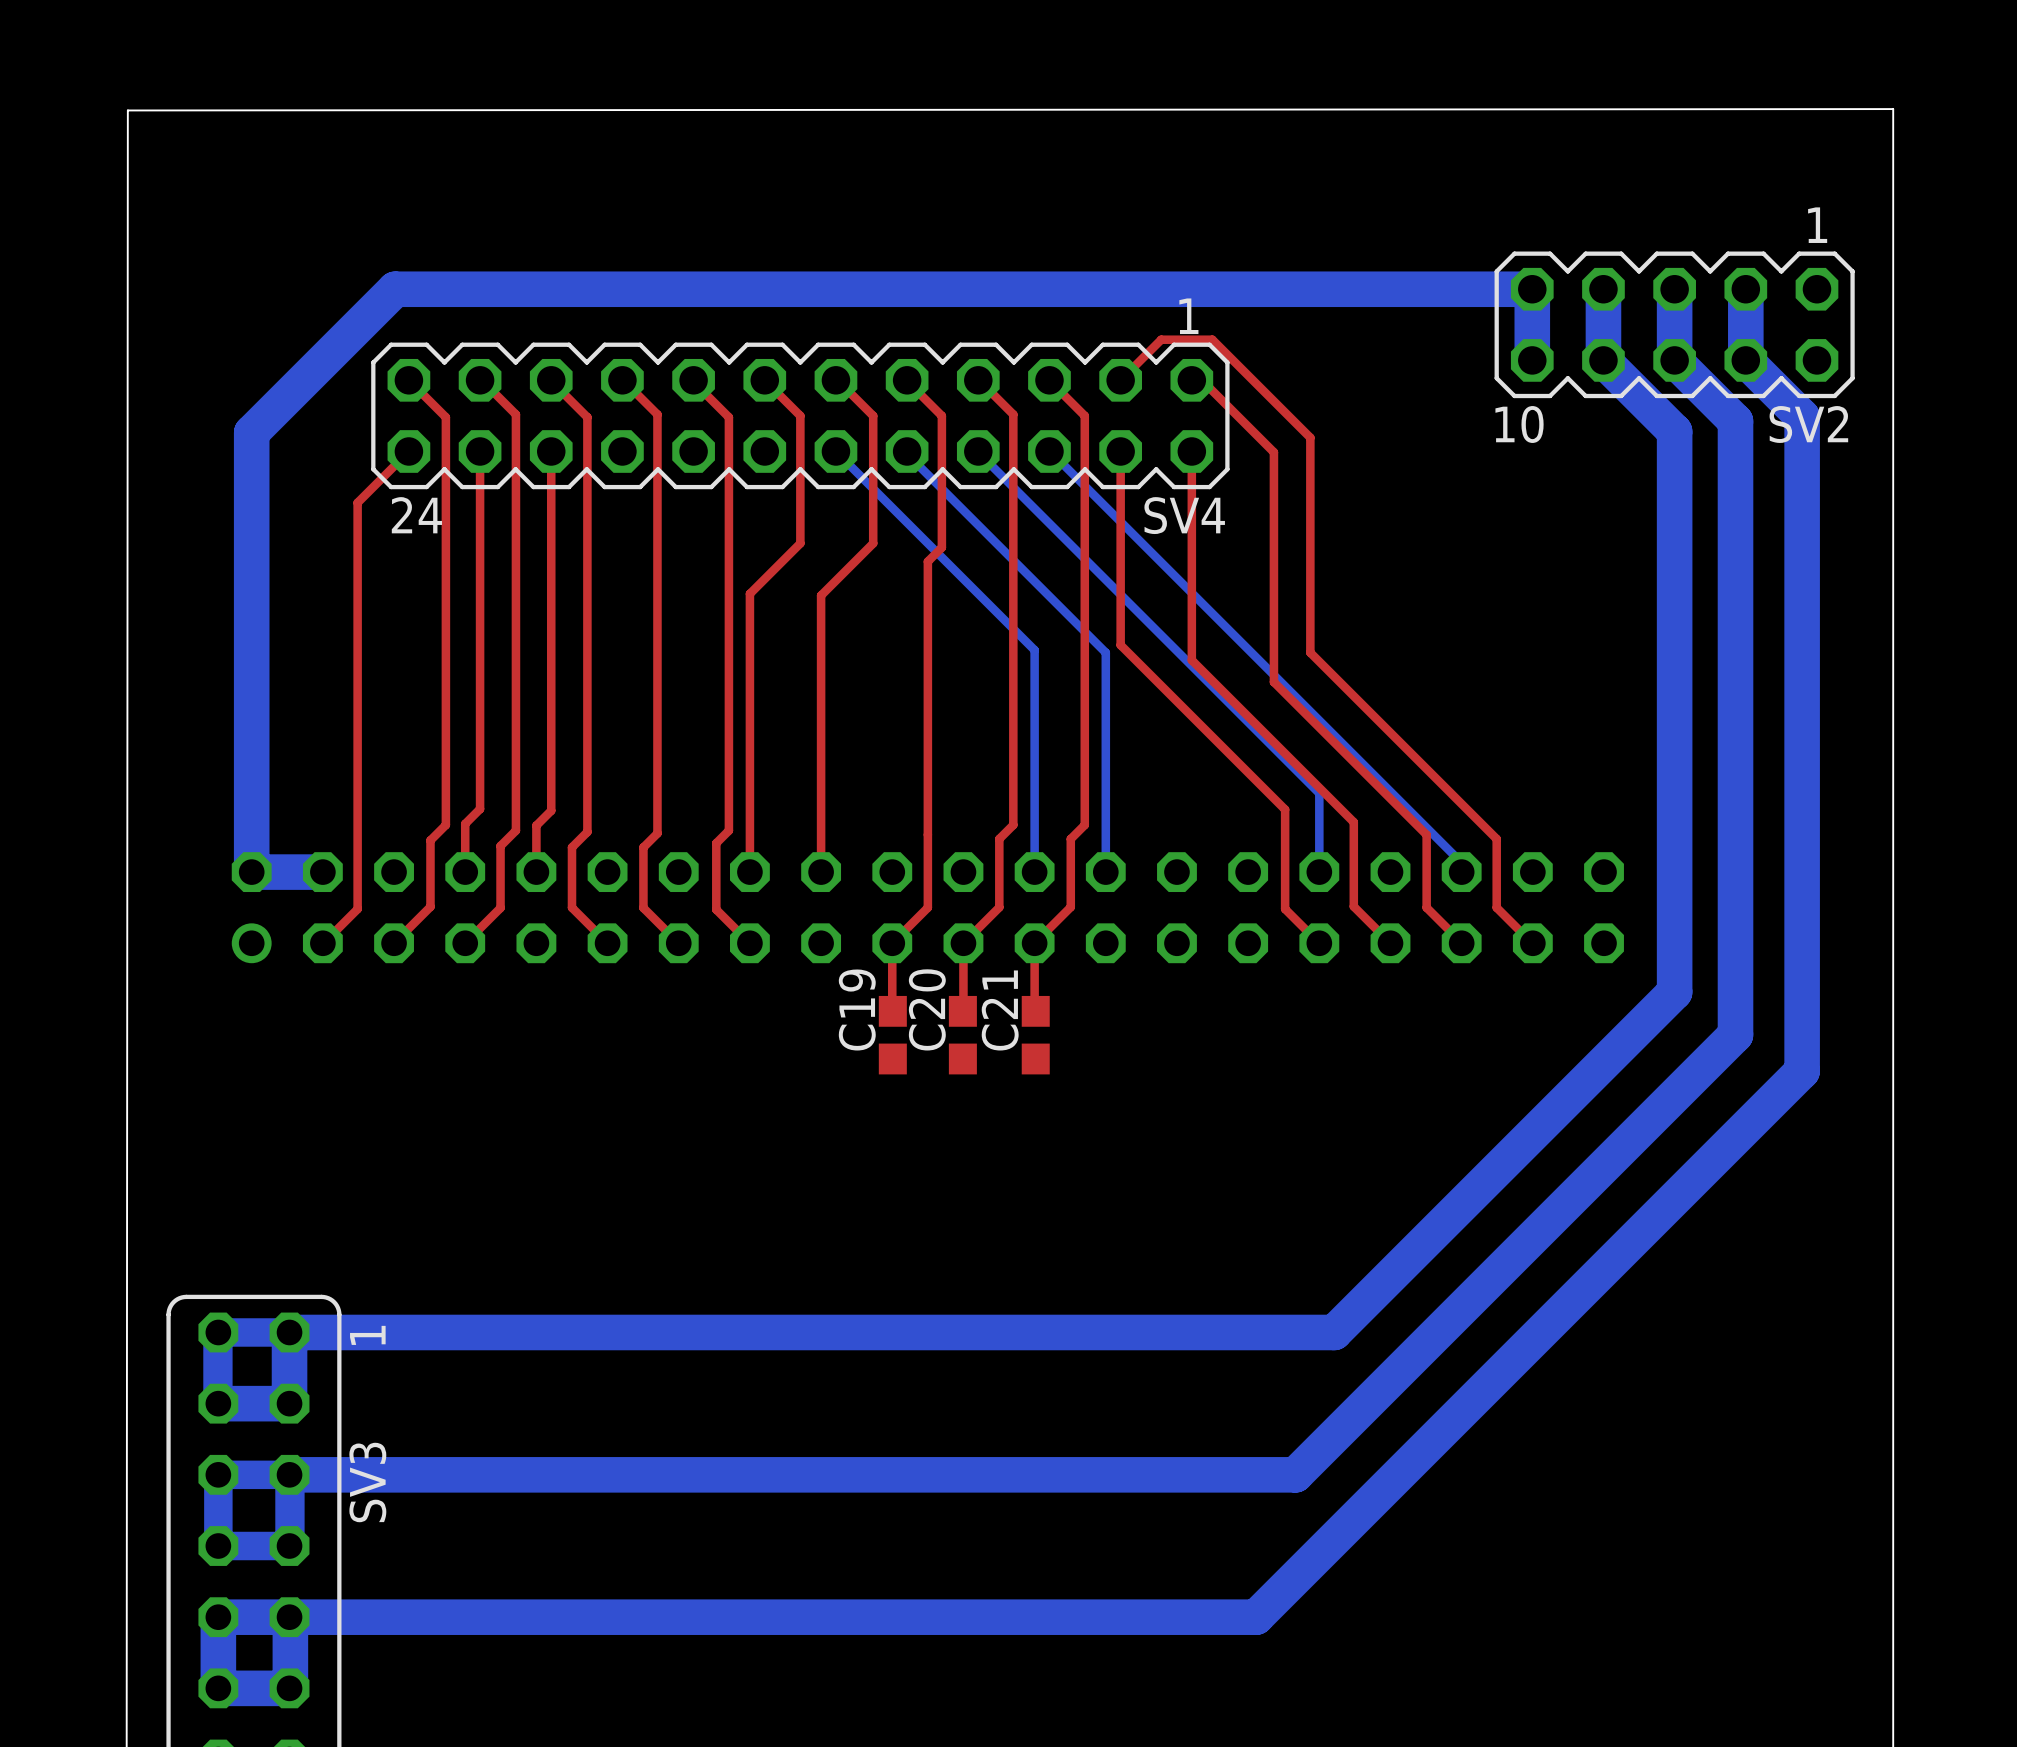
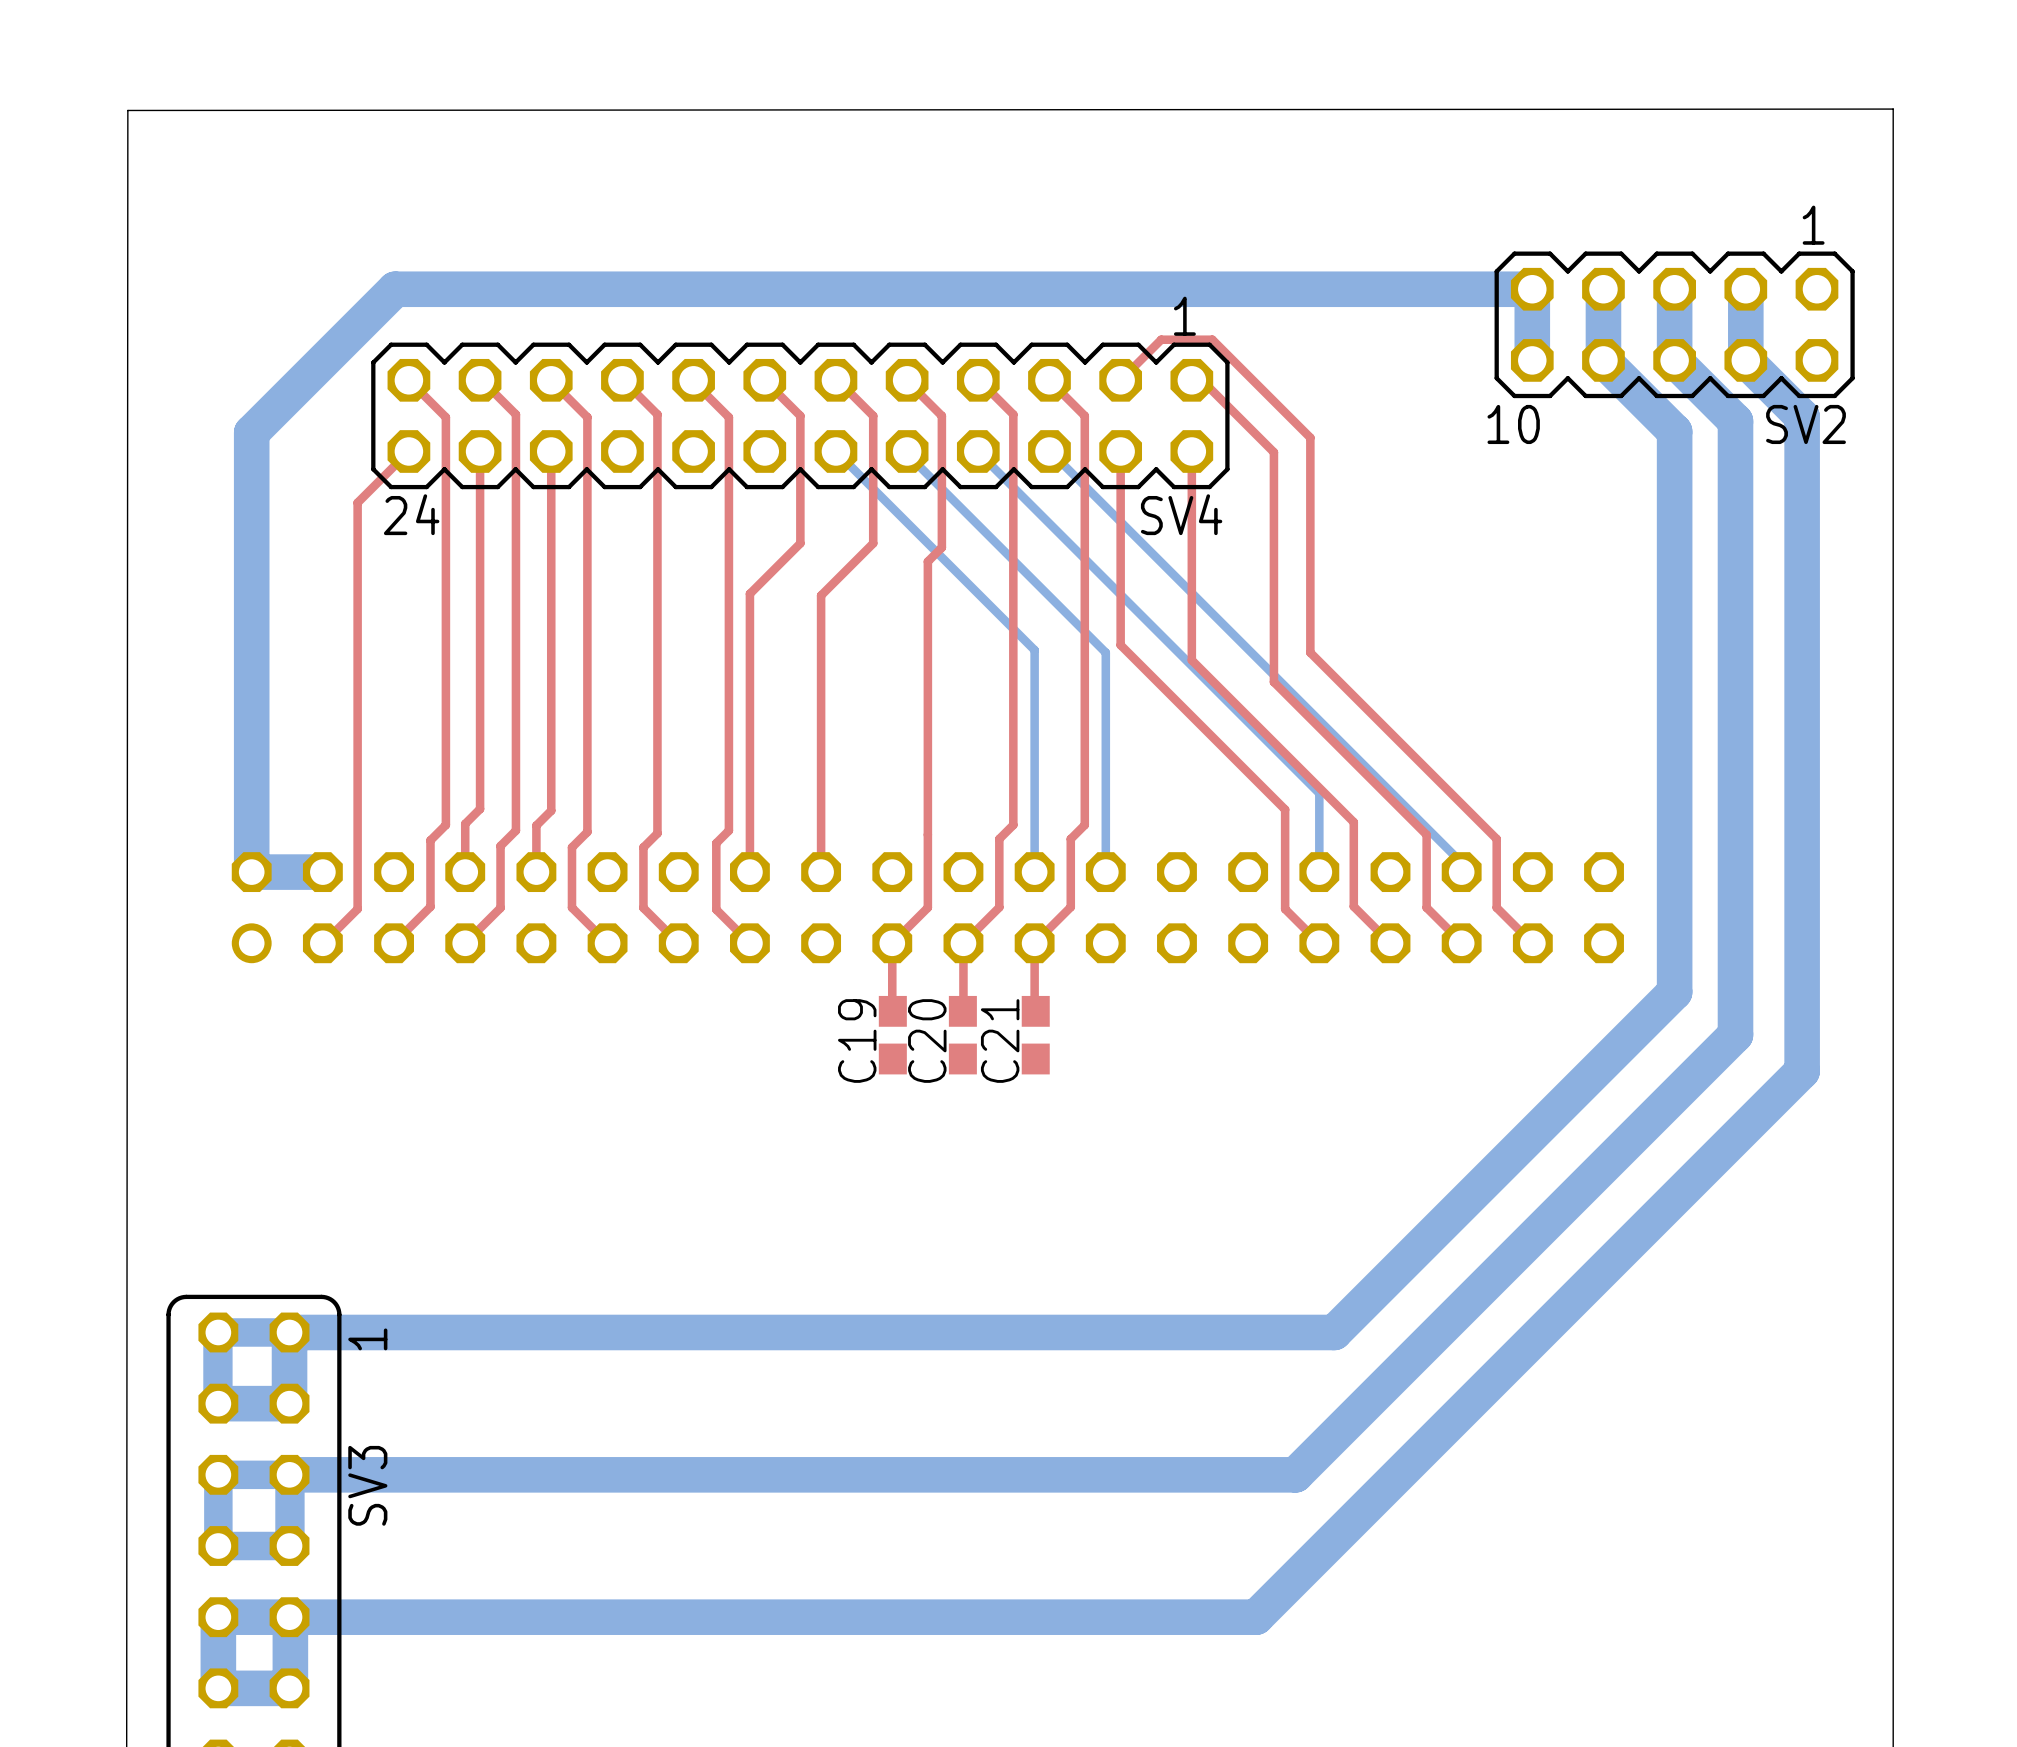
C19 name position: C19 (857, 1009) -> C19 (857, 1041)
C20 name position: C20 (927, 1009) -> C20 (927, 1041)
C21 name position: C21 (1000, 1010) -> C21 (1000, 1041)

